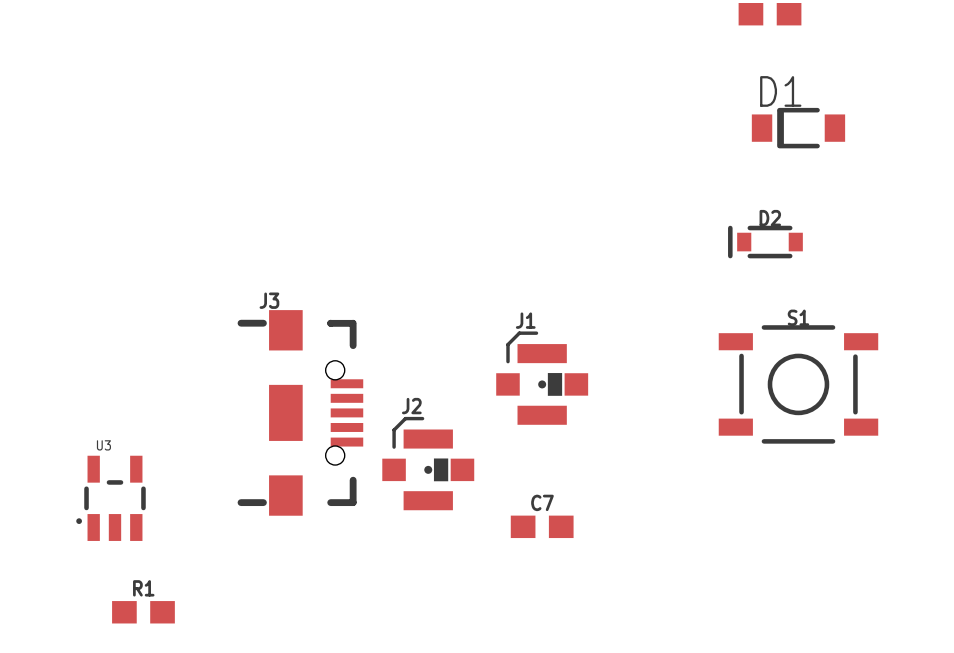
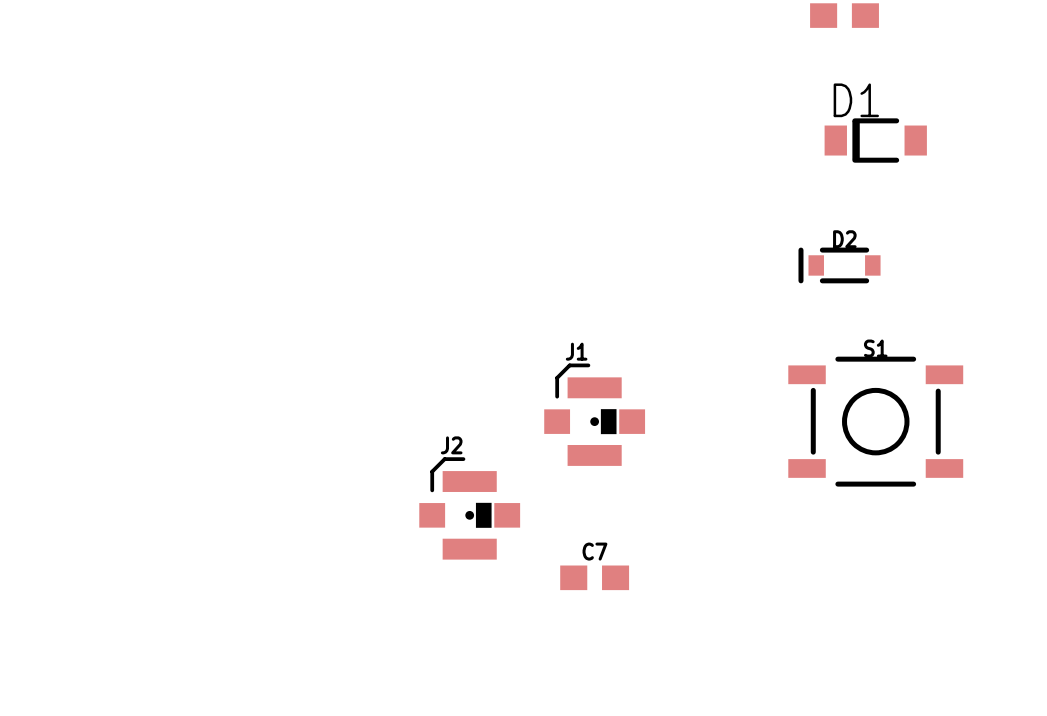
J3: (300, 412) -> none
U3: (111, 498) -> none
R1: (143, 612) -> none

